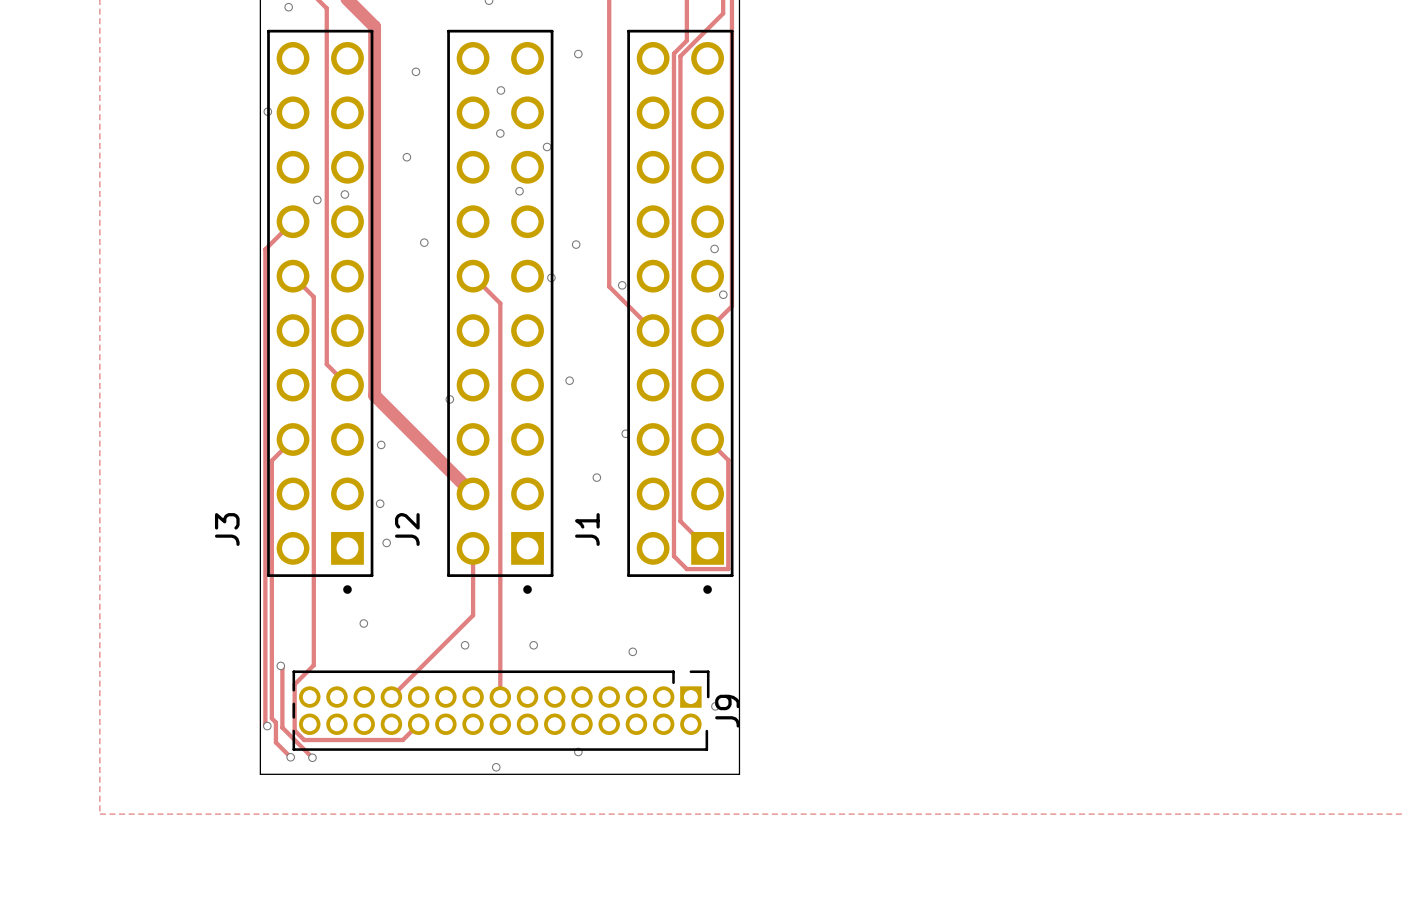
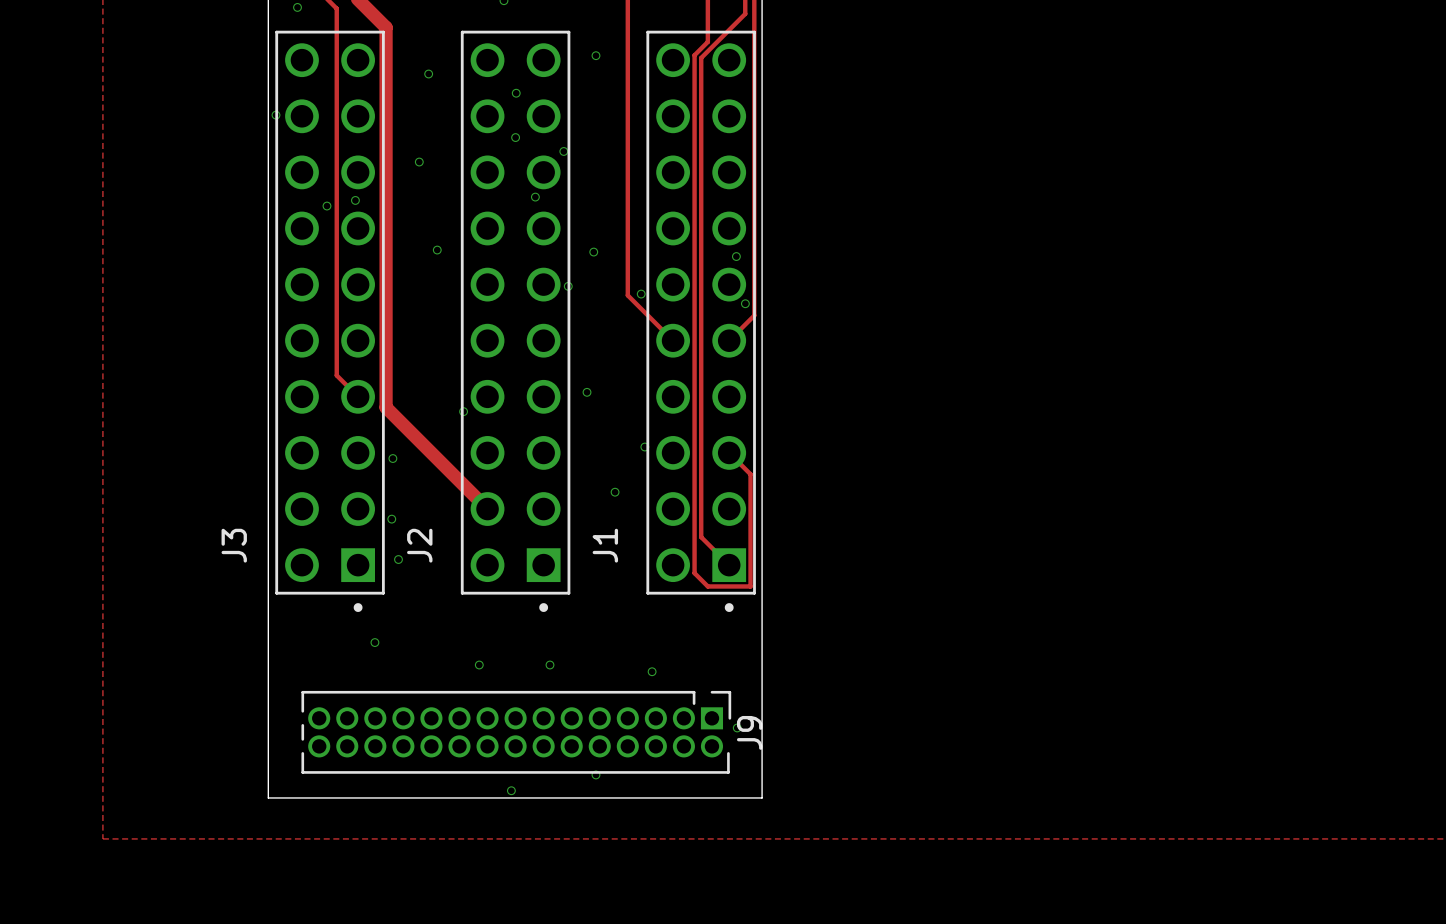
track: (293, 221) (265, 249) (265, 724) (267, 726) -> none
track: (293, 276) (313, 296) (313, 665) (294, 684) (294, 730) (304, 740) (402, 740) (418, 724) -> none
track: (473, 276) (500, 303) (500, 697) -> none
track: (293, 439) (271, 460) (271, 718) (275, 722) (275, 742) (290, 757) -> none
track: (473, 548) (473, 615) (391, 697) -> none
track: (280, 665) (282, 667) (282, 727) (312, 757) -> none
via: (280, 665) -> none
via: (267, 726) -> none
via: (290, 757) -> none
via: (312, 757) -> none

